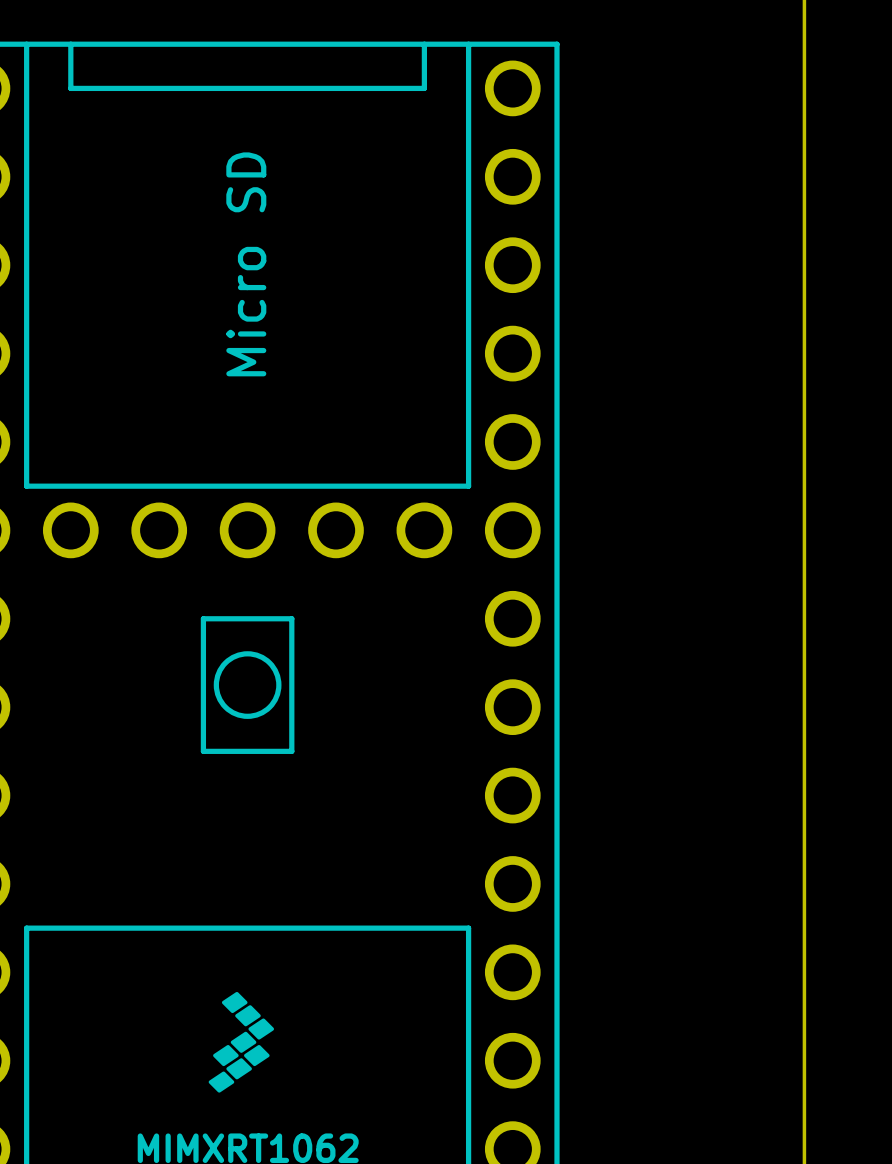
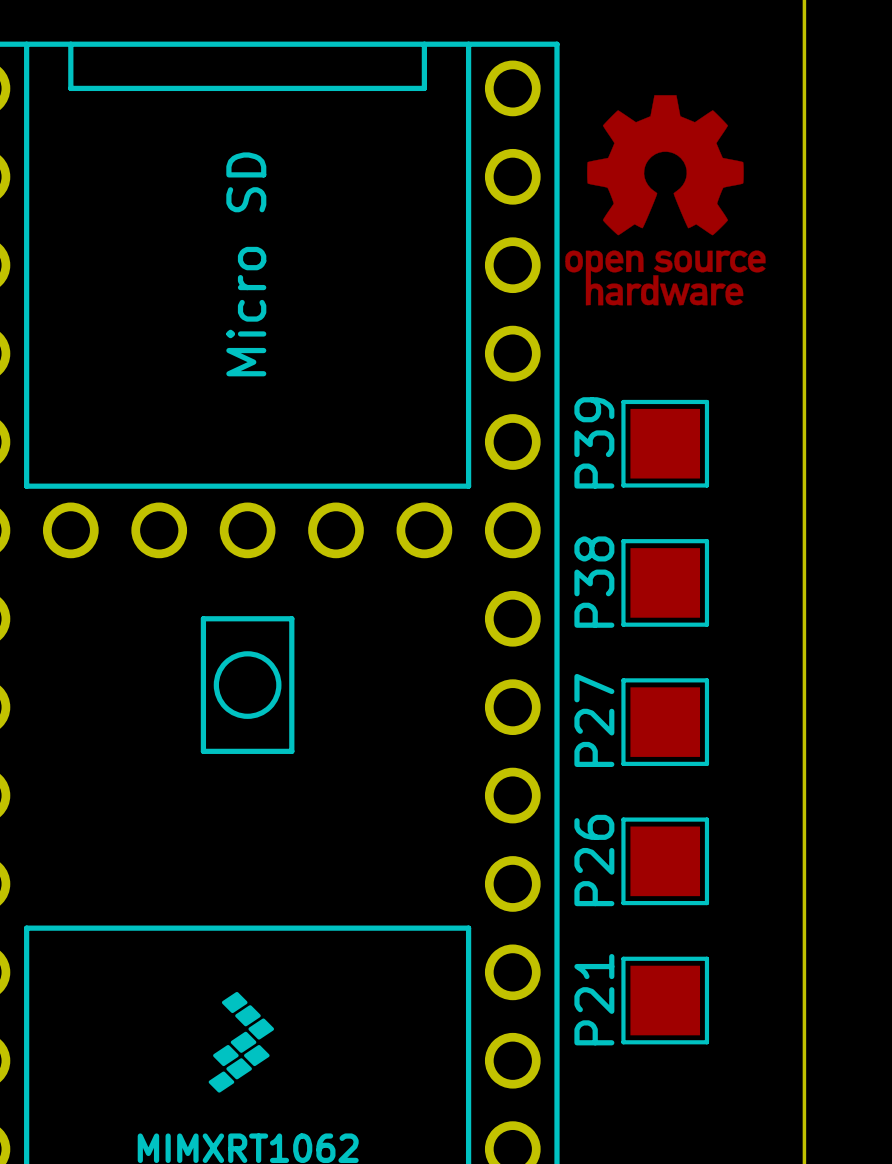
drawing: none -> [565, 95, 766, 306]
P39: none -> (665, 443)
P38: none -> (665, 582)
P27: none -> (665, 722)
P26: none -> (665, 861)
P21: none -> (665, 1000)

